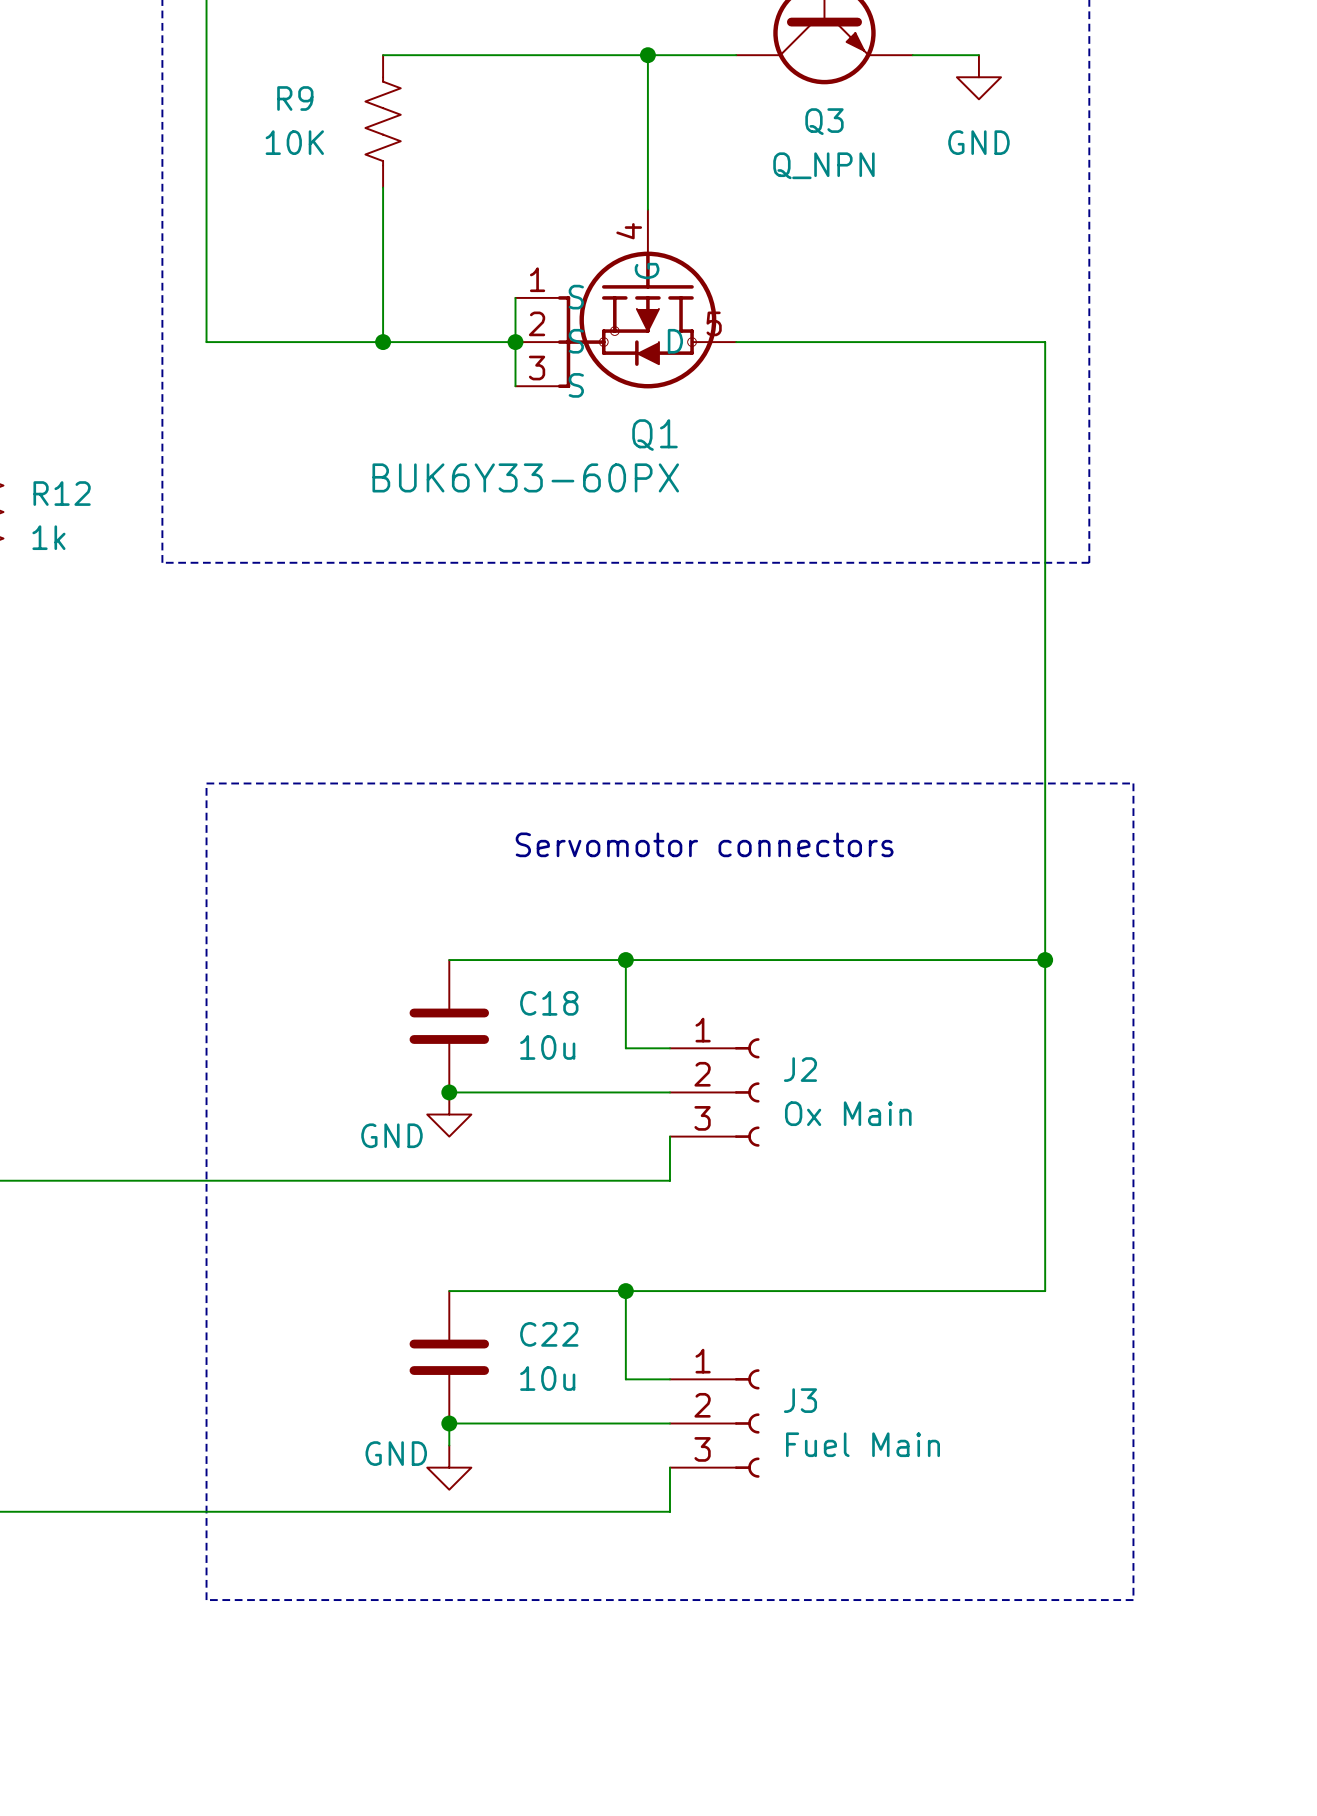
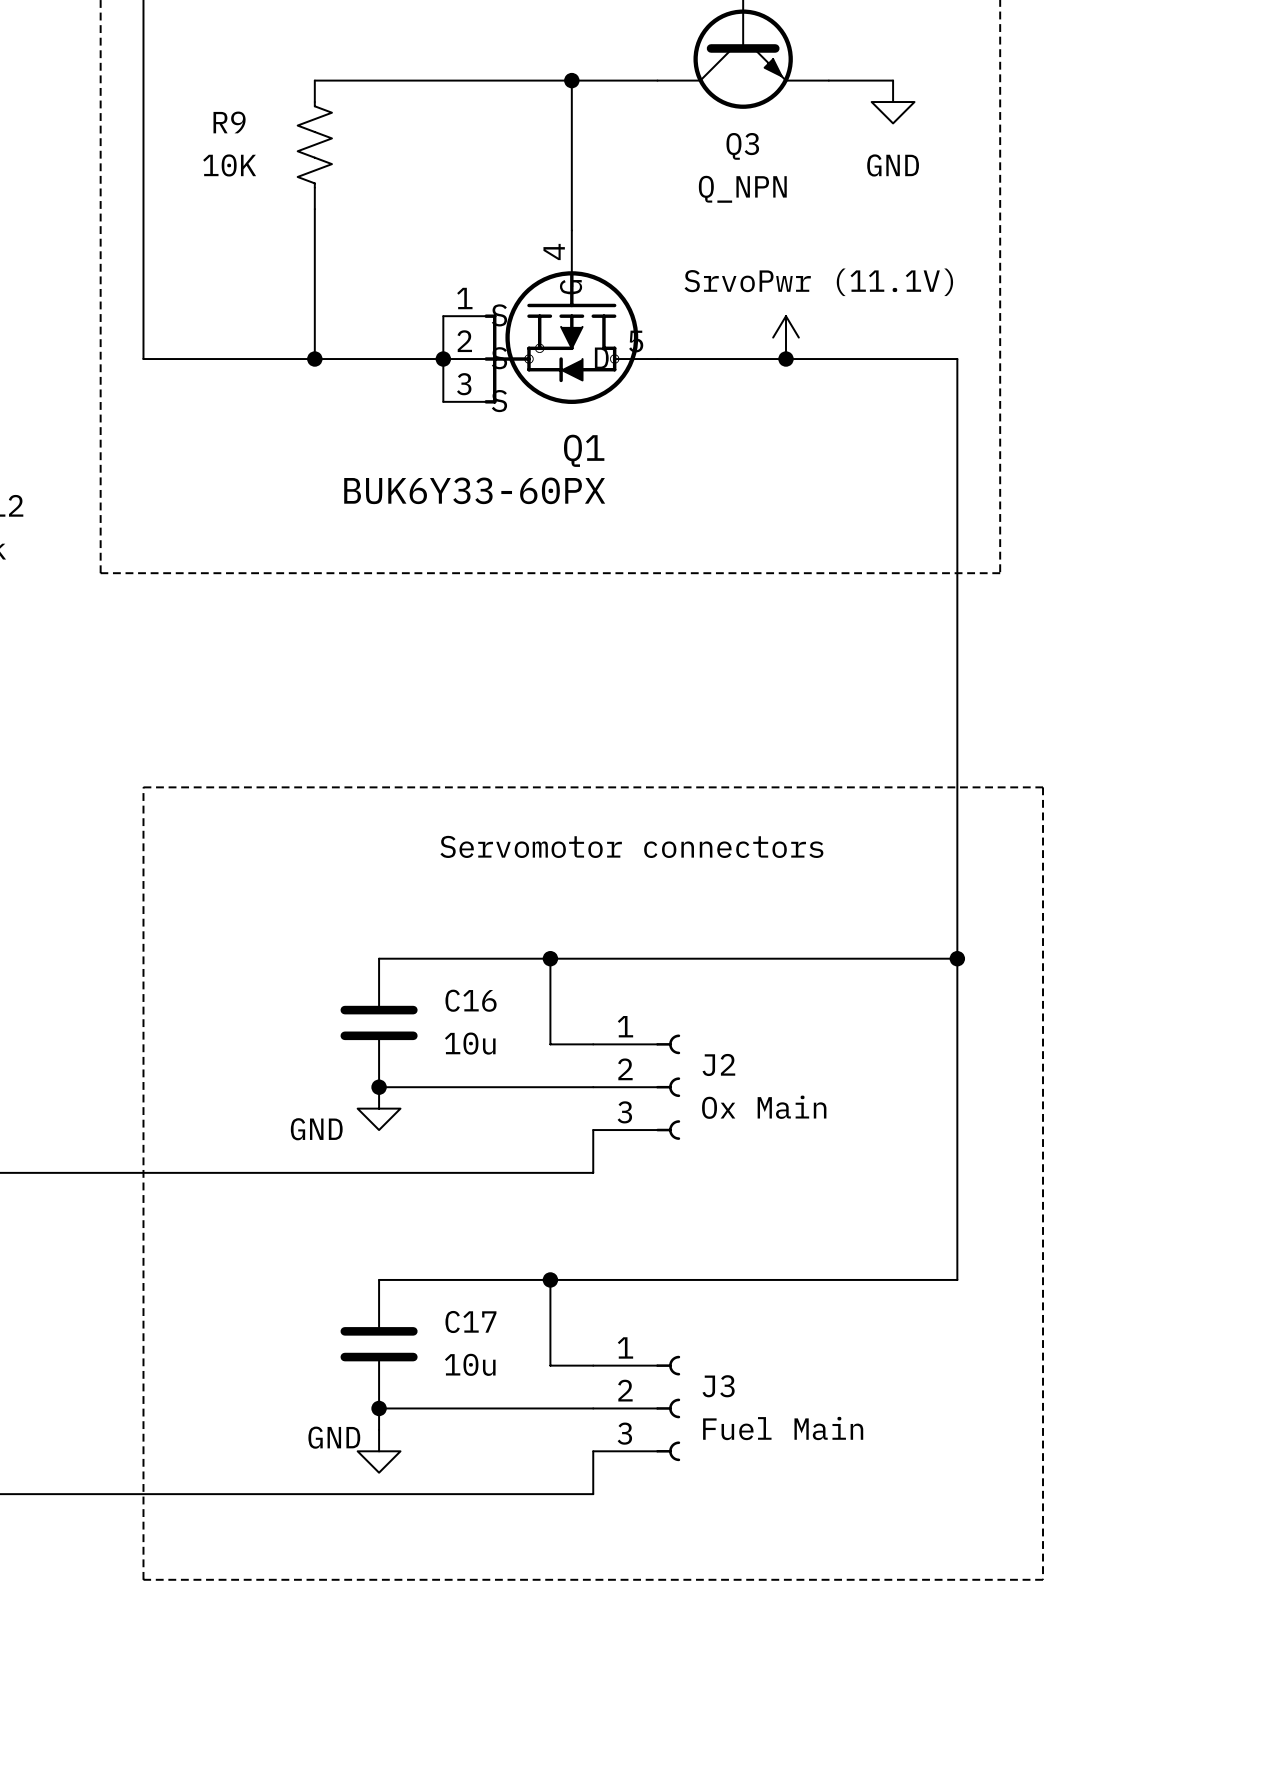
power symbol: none -> SrvoPwr (11.1V) (786, 337)
junction: none -> (786, 359)
C18 name: C18 (549, 1003) -> C16 (471, 1000)
C22 name: C22 (549, 1334) -> C17 (470, 1321)

